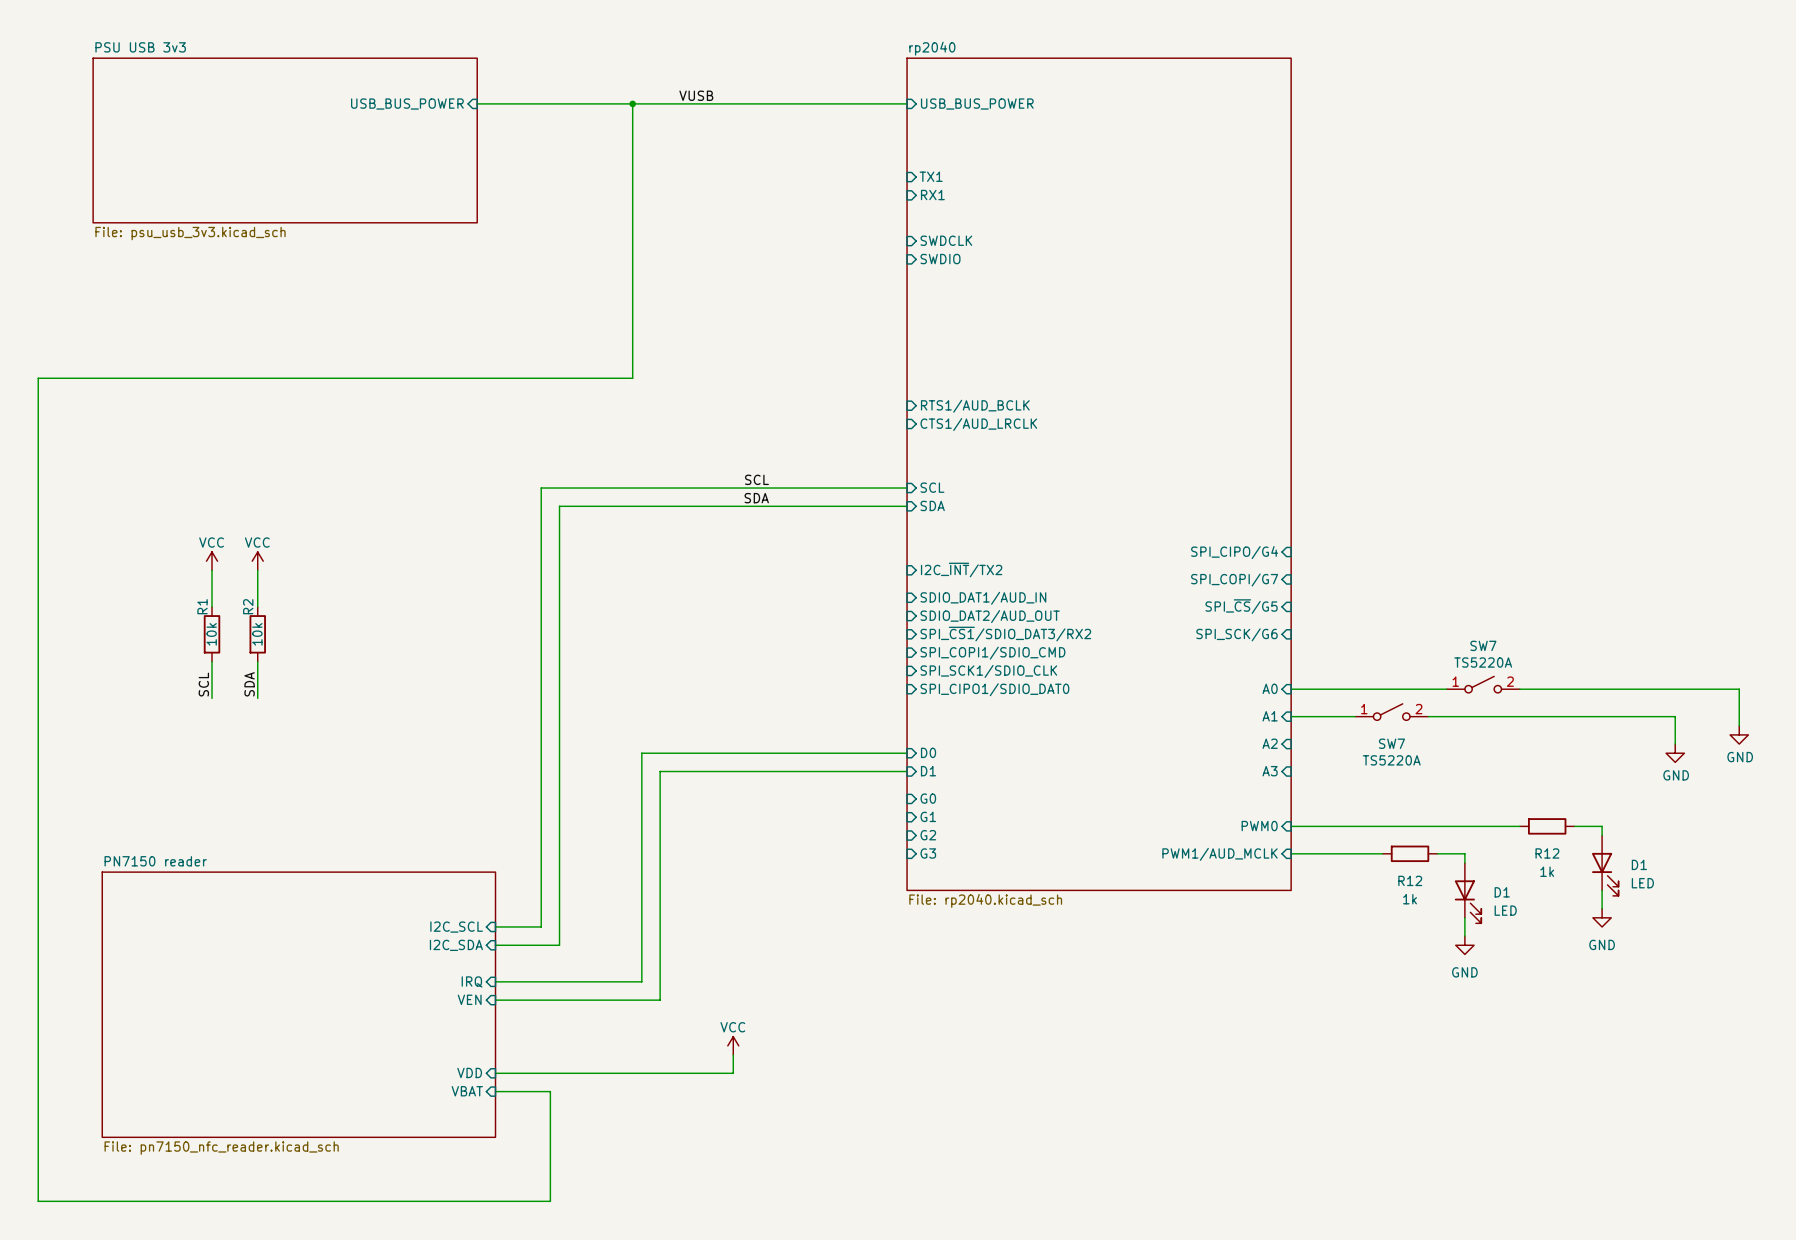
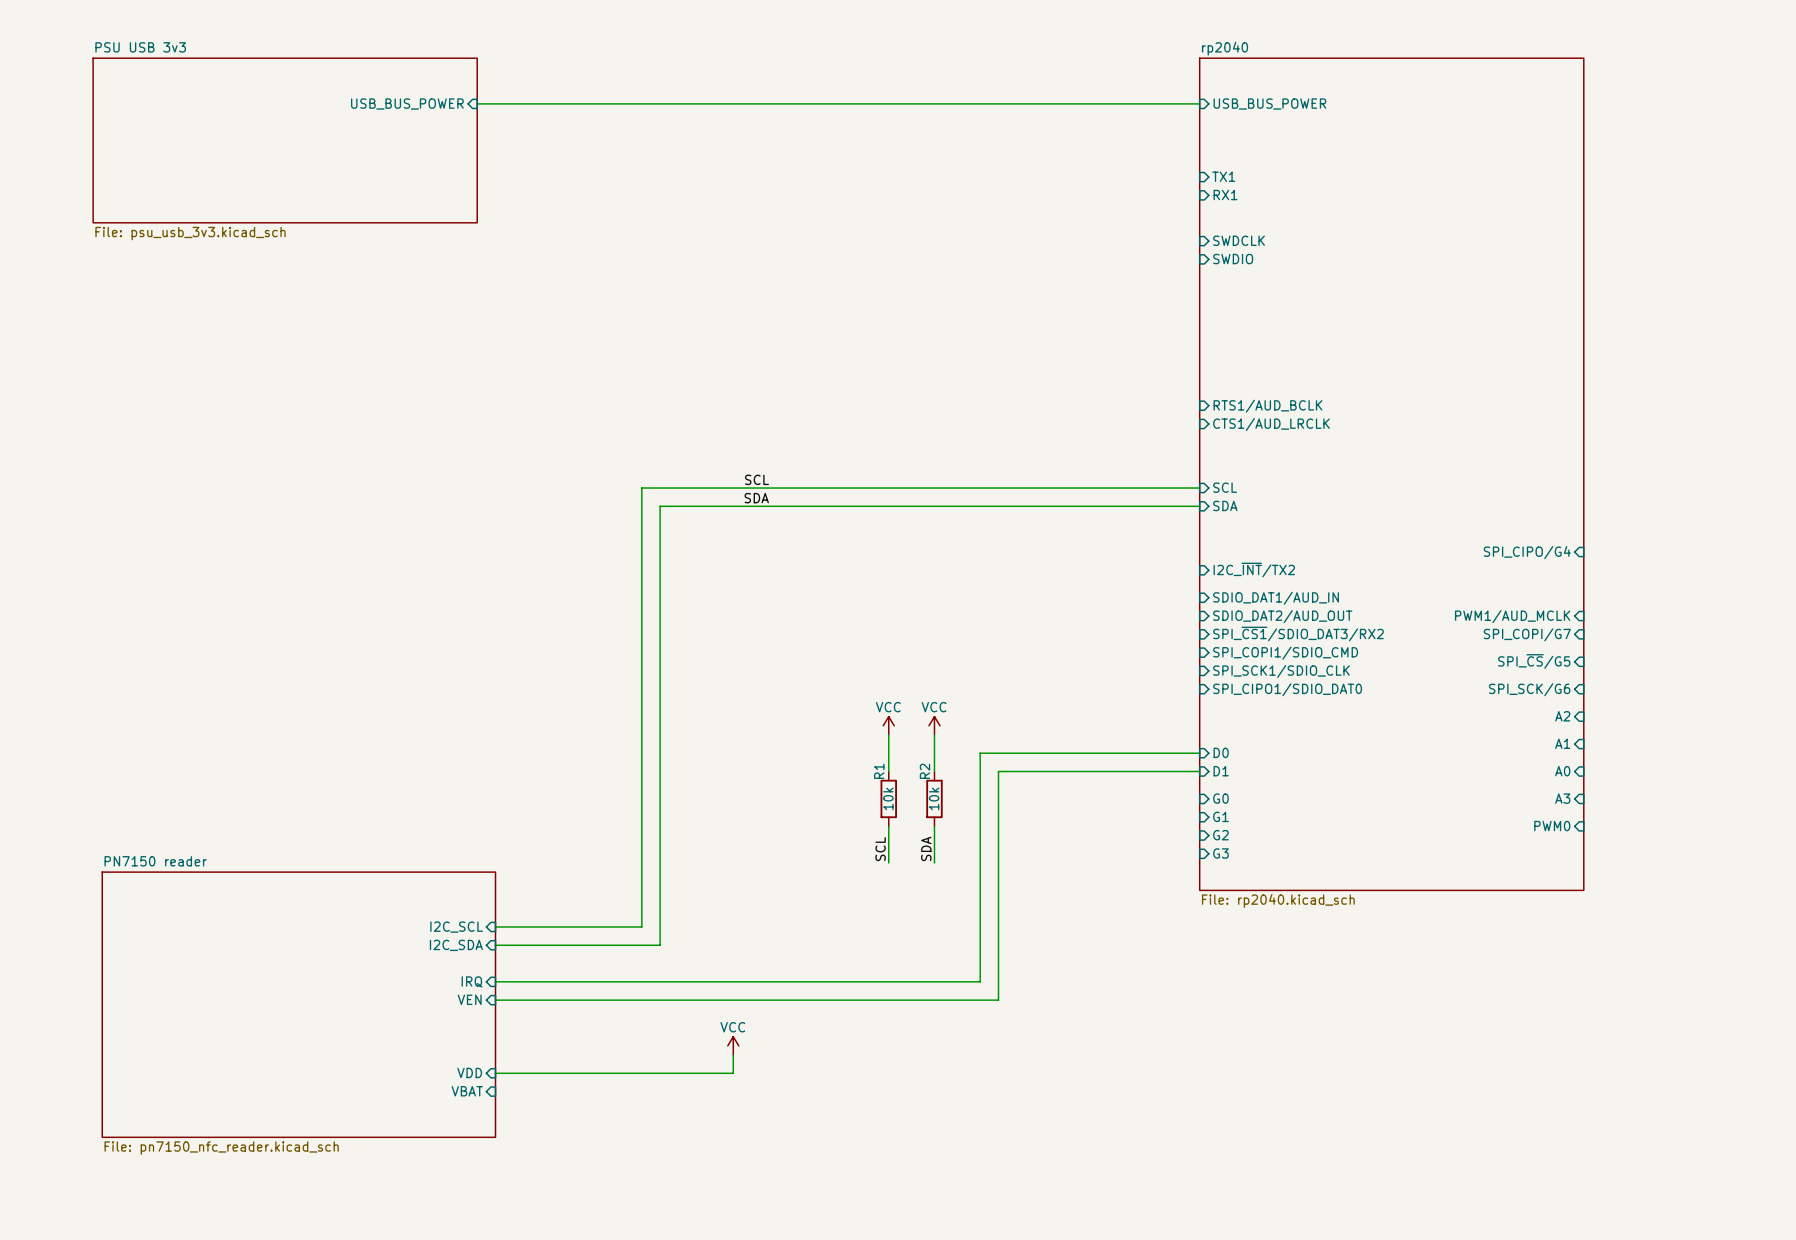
label: VUSB (696, 95) -> none
wire: (632, 103) (632, 378) (38, 378) (38, 1201) (550, 1201) (550, 1091) (495, 1091) -> none
junction: (632, 103) -> none
wire: none -> (907, 103) (1199, 103)
sheet pin: USB_BUS_POWER (977, 104) -> none
sheet pin: none -> USB_BUS_POWER (1269, 104)
sheet pin: TX1 (931, 176) -> none
sheet pin: none -> TX1 (1223, 176)
sheet pin: RX1 (932, 195) -> none
sheet pin: none -> RX1 (1225, 195)
sheet pin: SWDCLK (946, 240) -> none
sheet pin: none -> SWDCLK (1239, 240)
sheet pin: SWDIO (940, 259) -> none
sheet pin: none -> SWDIO (1233, 259)
sheet pin: RTS1/AUD_BCLK (975, 406) -> none
sheet pin: none -> RTS1/AUD_BCLK (1267, 406)
sheet pin: CTS1/AUD_LRCLK (978, 424) -> none
sheet pin: none -> CTS1/AUD_LRCLK (1271, 424)
sheet rp2040 position: (1099, 474) -> (1391, 474)
sheet pin: SCL (932, 487) -> none
sheet pin: none -> SCL (1225, 487)
wire: (641, 488) (541, 488) (541, 926) -> (641, 488) (641, 753)
wire: none -> (907, 488) (1199, 488)
sheet pin: SDA (932, 505) -> none
sheet pin: none -> SDA (1225, 505)
wire: (660, 506) (559, 506) (559, 945) -> (660, 506) (660, 771)
wire: none -> (907, 506) (1199, 506)
sheet pin: SPI_CIPO/G4 (1234, 552) -> none
sheet pin: none -> SPI_CIPO/G4 (1527, 552)
power symbol: VCC (212, 561) -> none
power symbol: VCC (257, 561) -> none
wire: (212, 570) (212, 606) -> none
wire: (257, 570) (257, 606) -> none
sheet pin: I2C_~{INT}/TX2 (961, 570) -> none
sheet pin: none -> I2C_~{INT}/TX2 (1254, 570)
sheet pin: SPI_COPI/G7 (1234, 579) -> none
sheet pin: SDIO_DAT1/AUD_IN (983, 598) -> none
sheet pin: none -> SDIO_DAT1/AUD_IN (1276, 598)
sheet pin: SPI_~{CS}/G5 (1241, 606) -> none
sheet pin: SDIO_DAT2/AUD_OUT (990, 616) -> none
sheet pin: none -> SDIO_DAT2/AUD_OUT (1282, 616)
sheet pin: none -> PWM1/AUD_MCLK (1512, 616)
R1 position: (212, 634) -> (888, 798)
R2 position: (257, 634) -> (934, 798)
sheet pin: SPI_~{CS1}/SDIO_DAT3/RX2 (1005, 634) -> none
sheet pin: SPI_SCK/G6 (1236, 634) -> none
sheet pin: none -> SPI_~{CS1}/SDIO_DAT3/RX2 (1298, 634)
sheet pin: none -> SPI_COPI/G7 (1527, 634)
sheet pin: SPI_COPI1/SDIO_CMD (992, 653) -> none
sheet pin: none -> SPI_COPI1/SDIO_CMD (1285, 653)
wire: (212, 661) (212, 698) -> none
wire: (257, 661) (257, 698) -> none
sheet pin: none -> SPI_~{CS}/G5 (1534, 661)
sheet pin: SPI_SCK1/SDIO_CLK (988, 671) -> none
sheet pin: none -> SPI_SCK1/SDIO_CLK (1281, 671)
label: SCL (203, 684) -> none
label: SDA (249, 684) -> none
SW7: TS5220A (1483, 684) -> none
sheet pin: A0 (1270, 688) -> none
sheet pin: SPI_CIPO1/SDIO_DAT0 (994, 689) -> none
sheet pin: none -> SPI_CIPO1/SDIO_DAT0 (1287, 689)
wire: (1291, 689) (1446, 689) -> none
wire: (1519, 689) (1739, 689) (1739, 725) -> none
sheet pin: none -> SPI_SCK/G6 (1529, 689)
SW7: TS5220A (1391, 712) -> none
sheet pin: A1 (1270, 716) -> none
wire: (1291, 716) (1355, 716) -> none
wire: (1428, 716) (1675, 716) (1675, 744) -> none
sheet pin: none -> A2 (1562, 716)
power symbol: none -> VCC (888, 725)
power symbol: none -> VCC (934, 725)
wire: none -> (888, 734) (888, 771)
wire: none -> (934, 734) (934, 771)
power symbol: GND (1739, 734) -> none
sheet pin: A2 (1270, 743) -> none
sheet pin: none -> A1 (1562, 743)
sheet pin: D0 (928, 752) -> none
sheet pin: none -> D0 (1221, 752)
wire: (641, 753) (907, 753) -> none
wire: none -> (1199, 753) (980, 753) (980, 981) (641, 981)
power symbol: GND (1675, 753) -> none
wire: (660, 771) (907, 771) -> none
sheet pin: D1 (928, 771) -> none
wire: none -> (1199, 771) (998, 771) (998, 1000) (660, 1000)
sheet pin: none -> D1 (1221, 771)
sheet pin: A3 (1270, 771) -> none
sheet pin: none -> A0 (1562, 771)
sheet pin: G0 (928, 798) -> none
sheet pin: none -> G0 (1220, 798)
sheet pin: none -> A3 (1562, 798)
sheet pin: G1 (928, 816) -> none
sheet pin: none -> G1 (1220, 816)
wire: none -> (888, 826) (888, 862)
wire: none -> (934, 826) (934, 862)
sheet pin: PWM0 (1259, 826) -> none
wire: (1291, 826) (1519, 826) -> none
R12: 1k (1547, 826) -> none
sheet pin: none -> PWM0 (1552, 826)
wire: (1574, 826) (1602, 826) (1602, 835) -> none
sheet pin: G2 (928, 835) -> none
sheet pin: none -> G2 (1220, 835)
label: none -> SDA (926, 848)
label: none -> SCL (880, 849)
sheet pin: G3 (928, 853) -> none
sheet pin: none -> G3 (1220, 853)
wire: (1291, 853) (1382, 853) -> none
R12: 1k (1410, 853) -> none
wire: (1437, 853) (1464, 853) (1464, 862) -> none
sheet pin: PWM1/AUD_MCLK (1220, 854) -> none
D1: LED (1605, 865) -> none
wire: (1602, 890) (1602, 908) -> none
D1: LED (1468, 893) -> none
wire: (1464, 917) (1464, 936) -> none
power symbol: GND (1602, 917) -> none
wire: (641, 926) (641, 981) -> (641, 926) (541, 926)
wire: (660, 945) (660, 1000) -> (660, 945) (559, 945)
power symbol: GND (1464, 945) -> none

